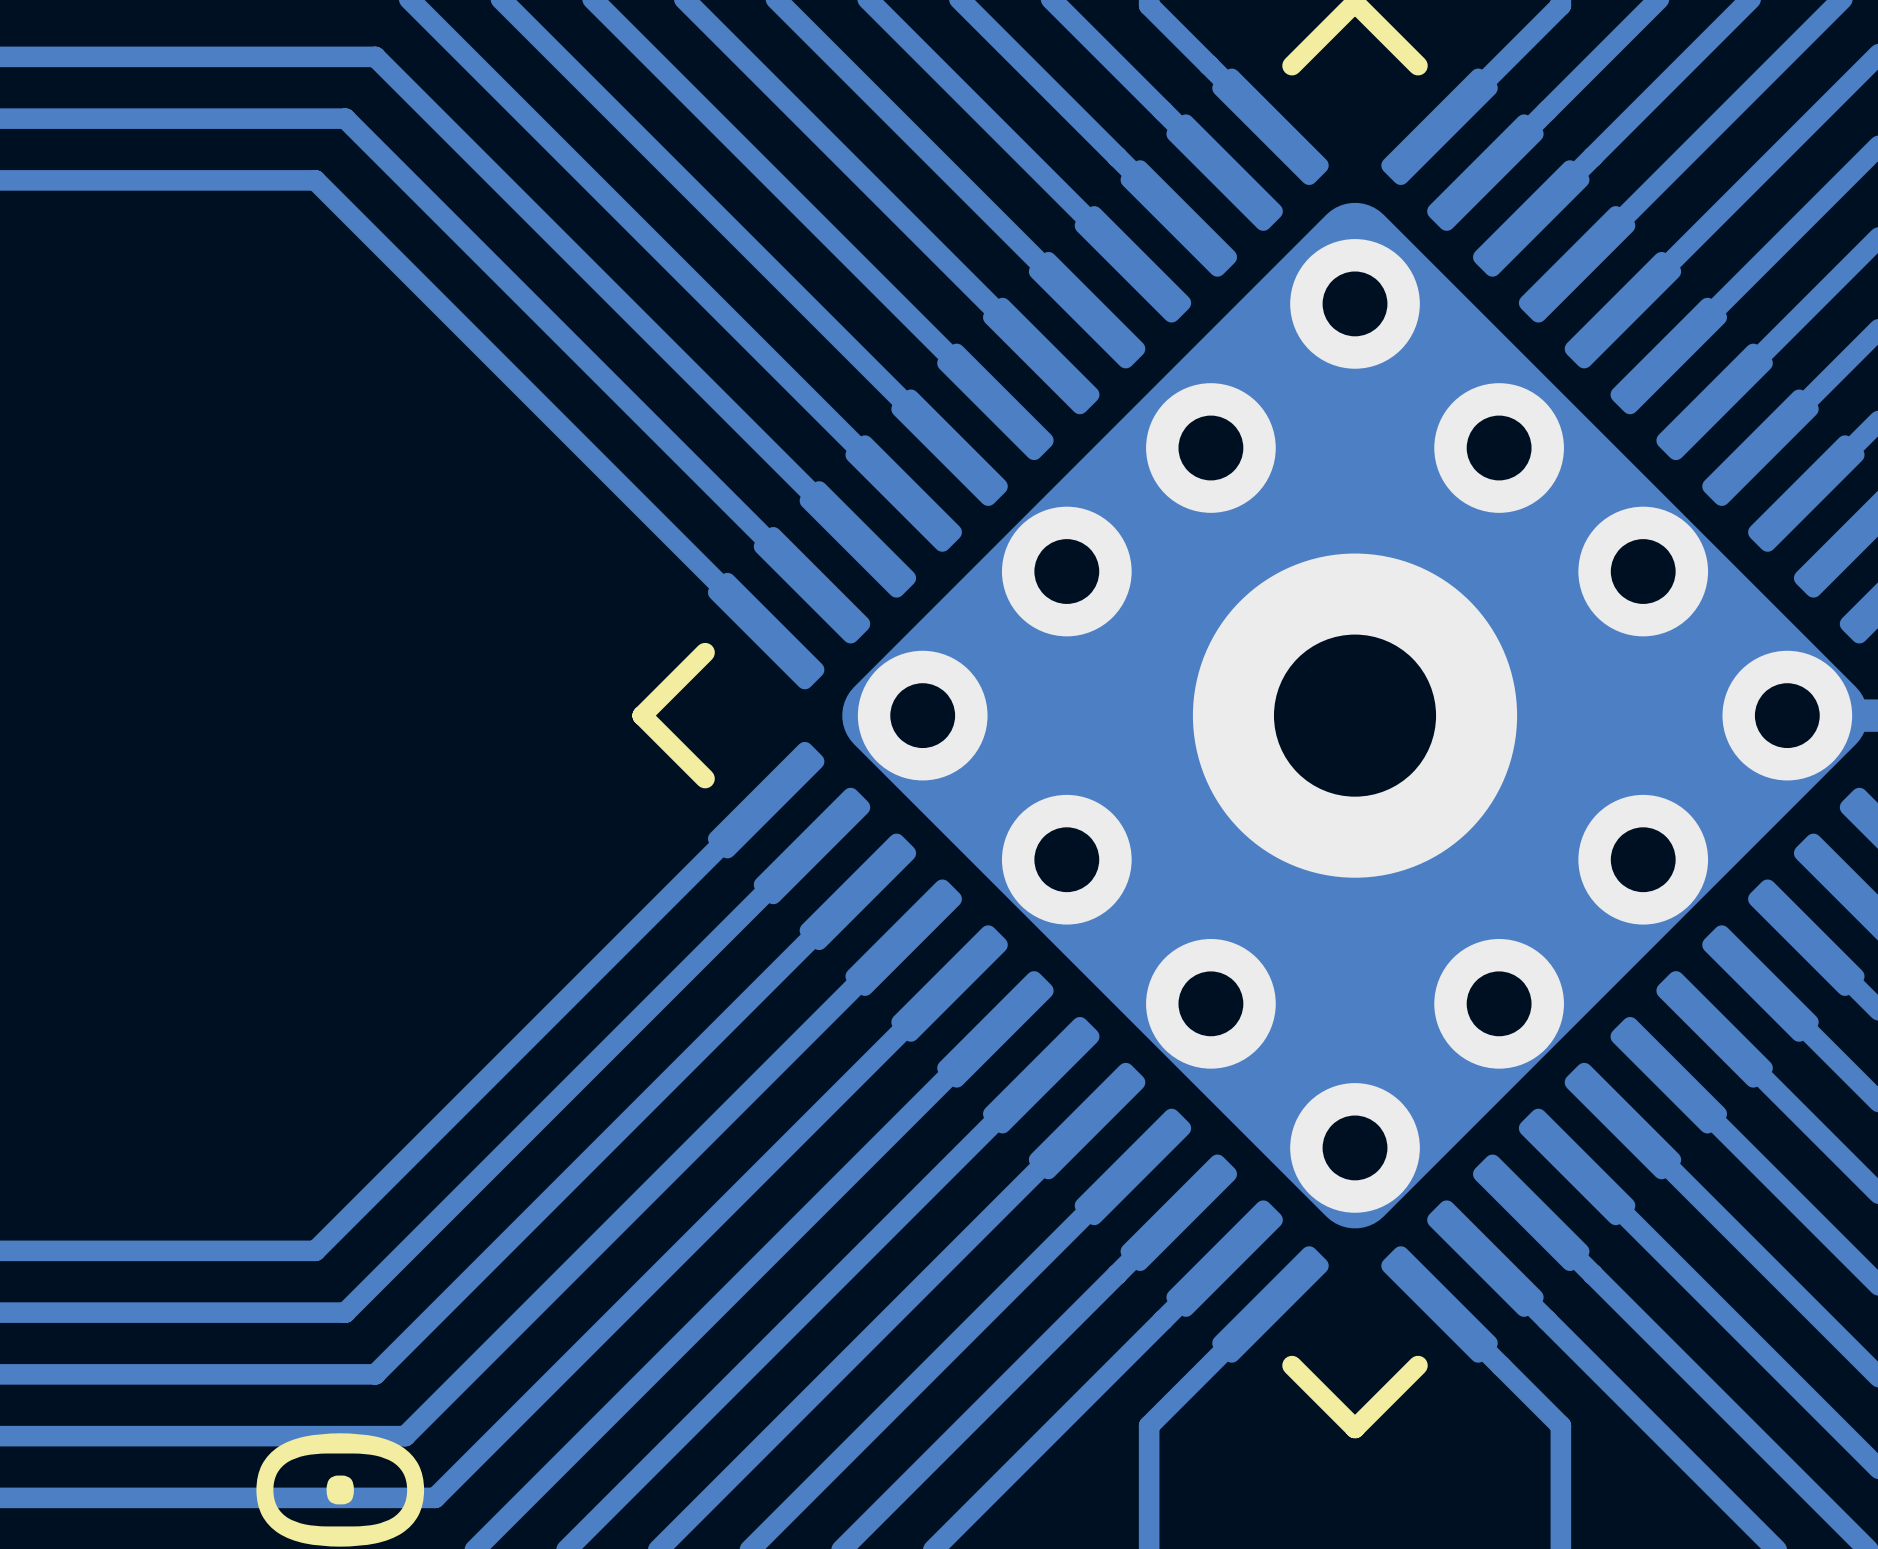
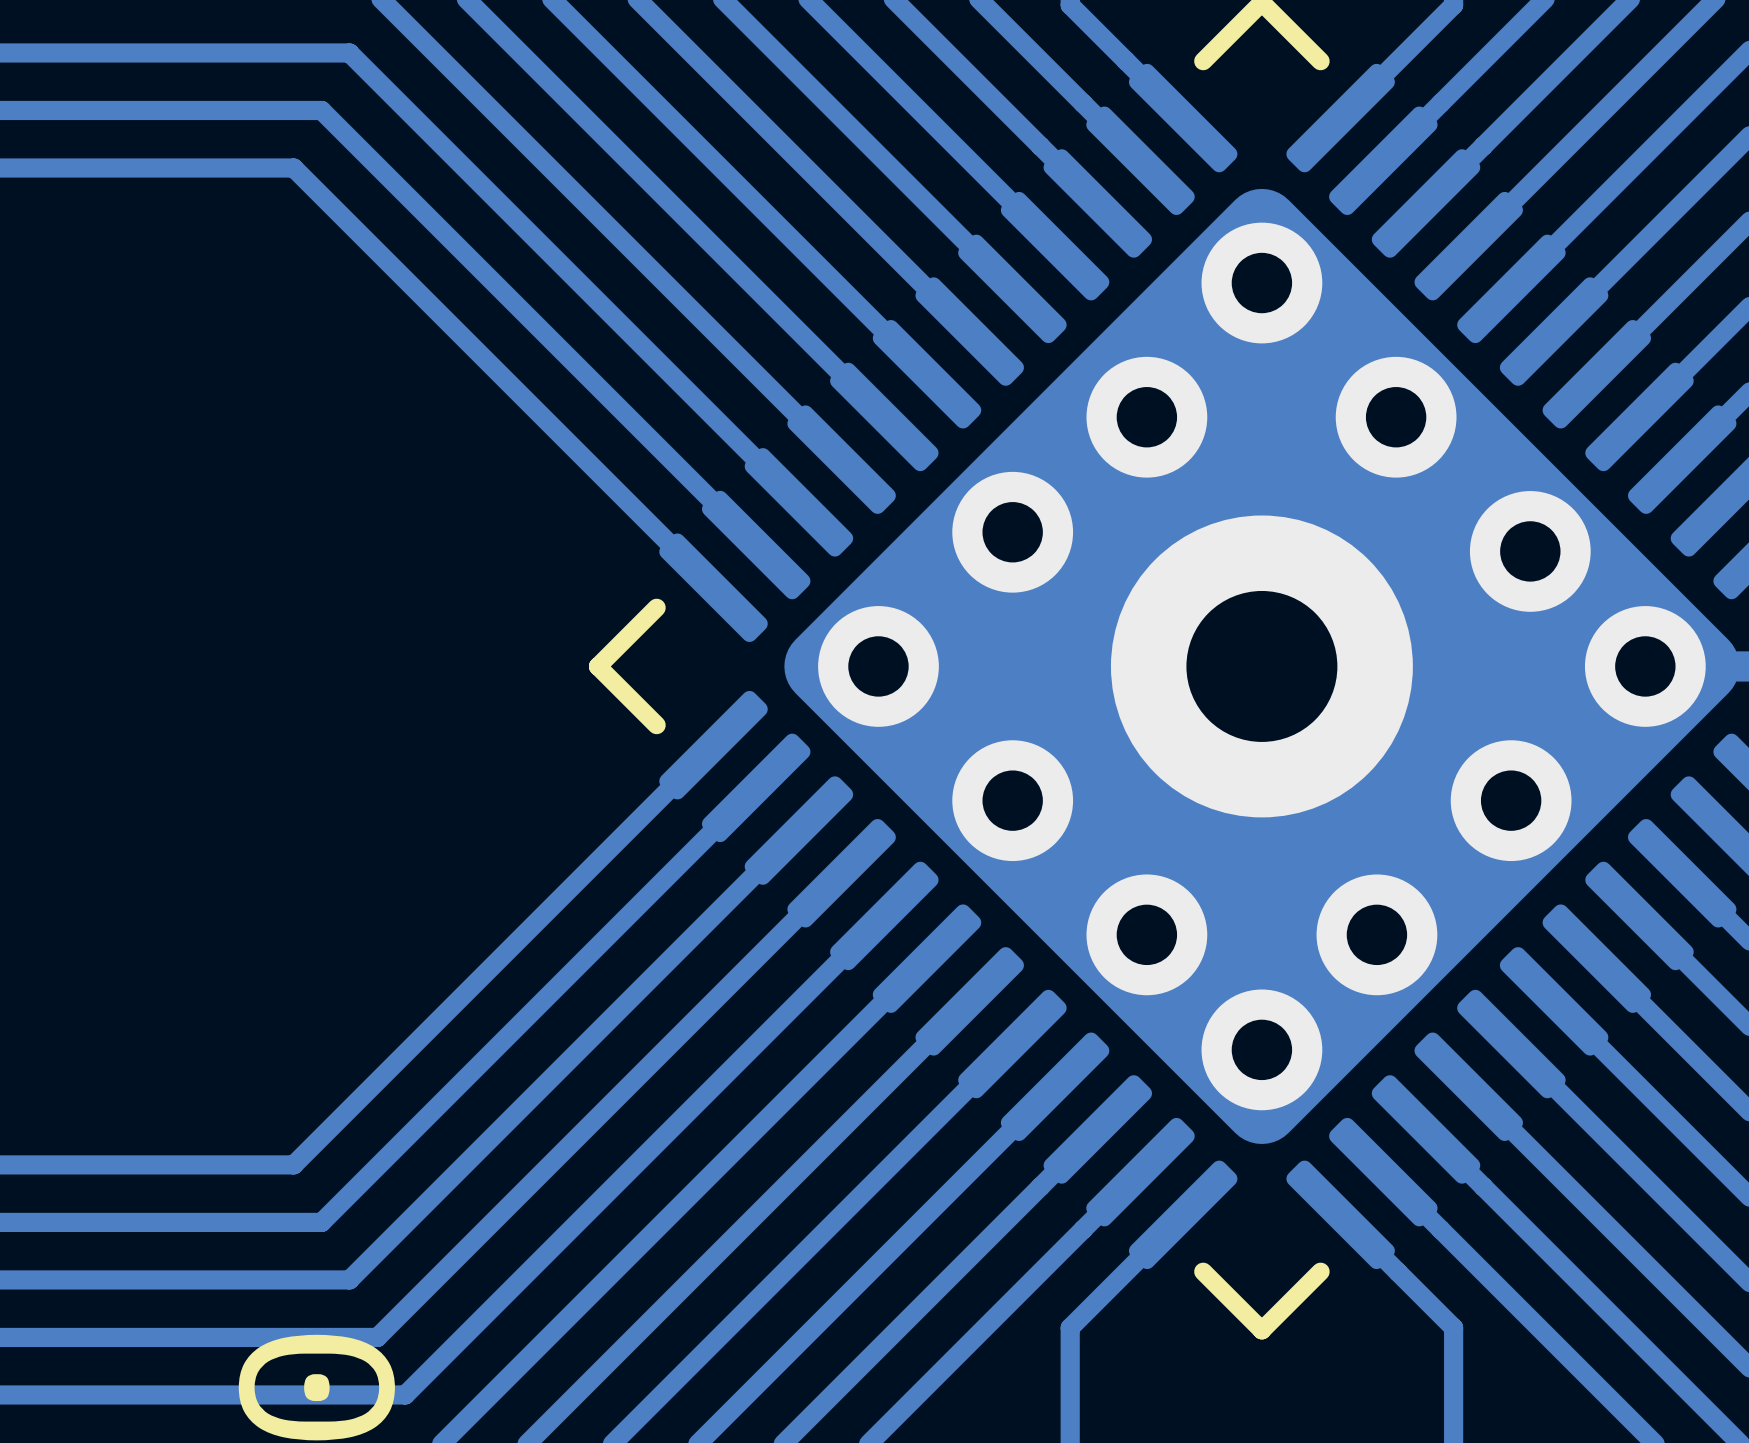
via position: (1210, 448) -> (1146, 417)
via position: (1066, 571) -> (1012, 532)
via position: (1643, 571) -> (1530, 551)
via position: (922, 715) -> (878, 666)
via position: (1787, 715) -> (1645, 666)
via position: (1066, 859) -> (1012, 800)
via position: (1643, 859) -> (1511, 800)
via position: (1210, 1003) -> (1146, 934)
via position: (1499, 1003) -> (1376, 934)
via position: (1355, 1147) -> (1261, 1049)

